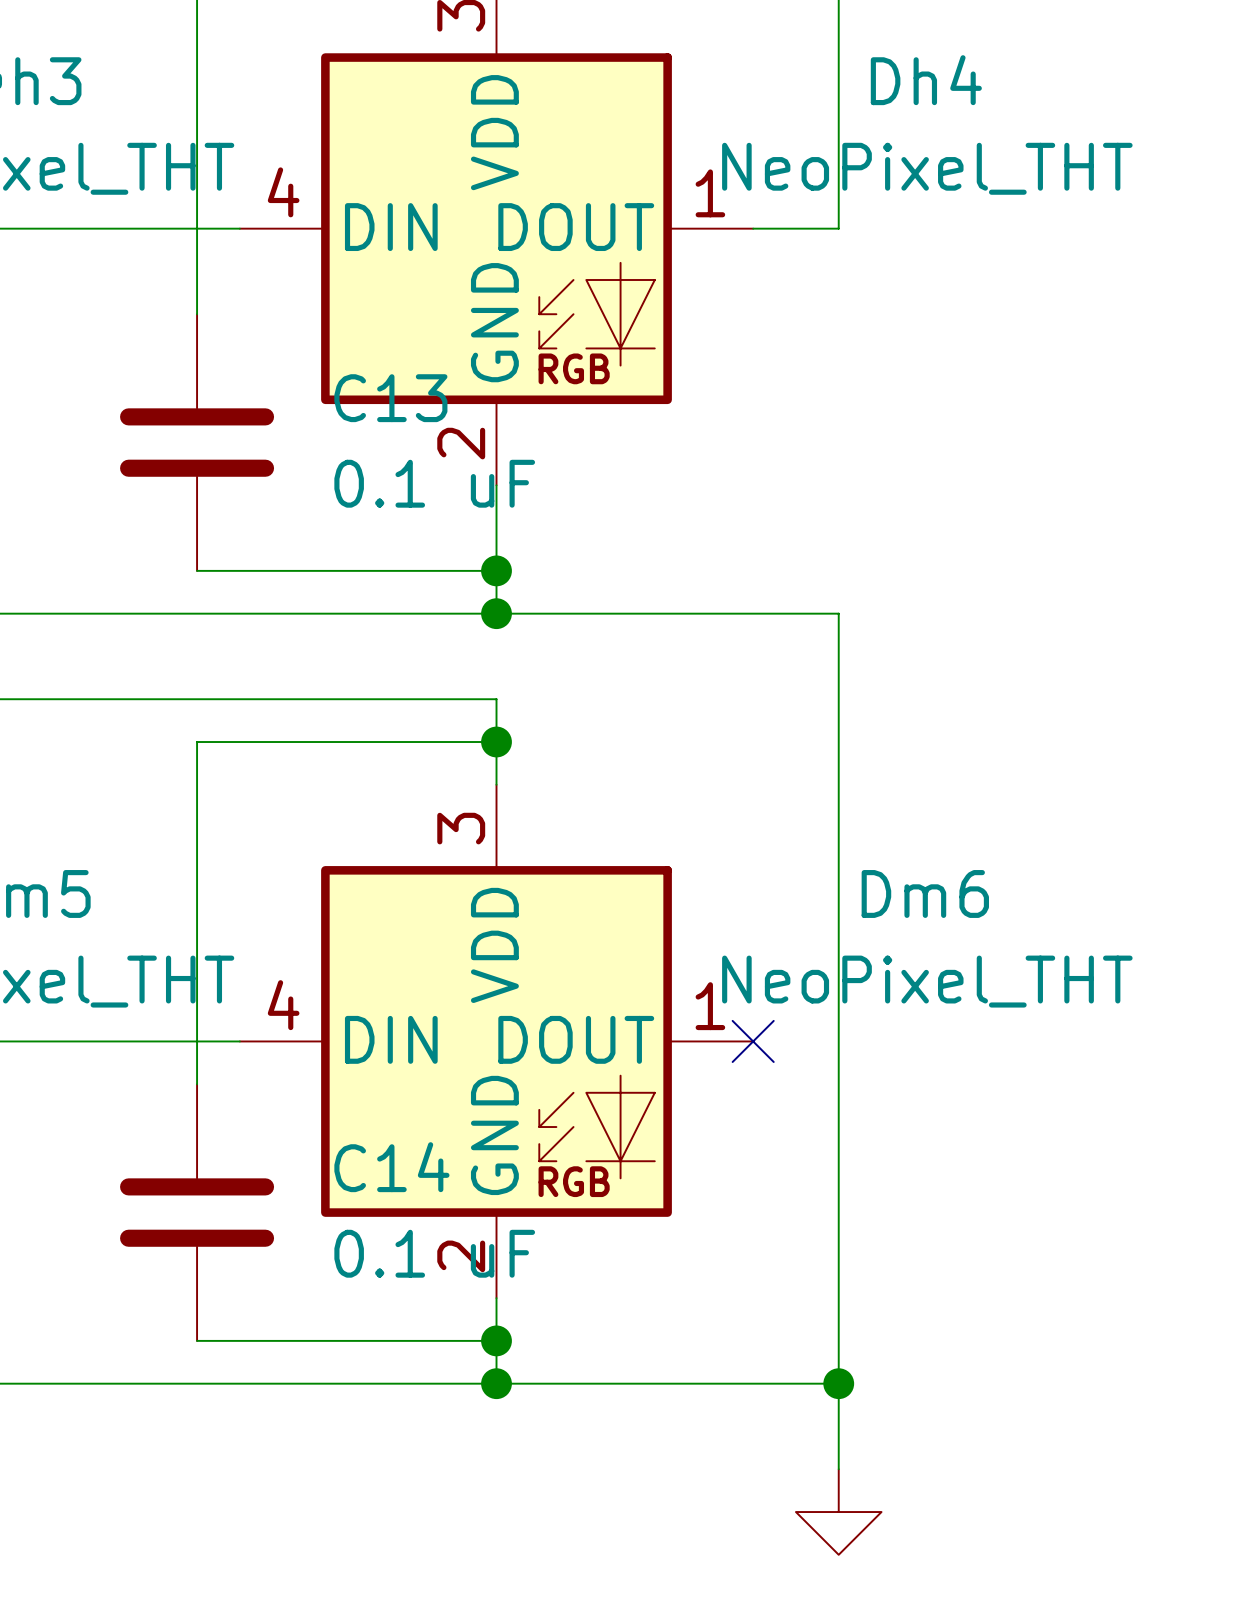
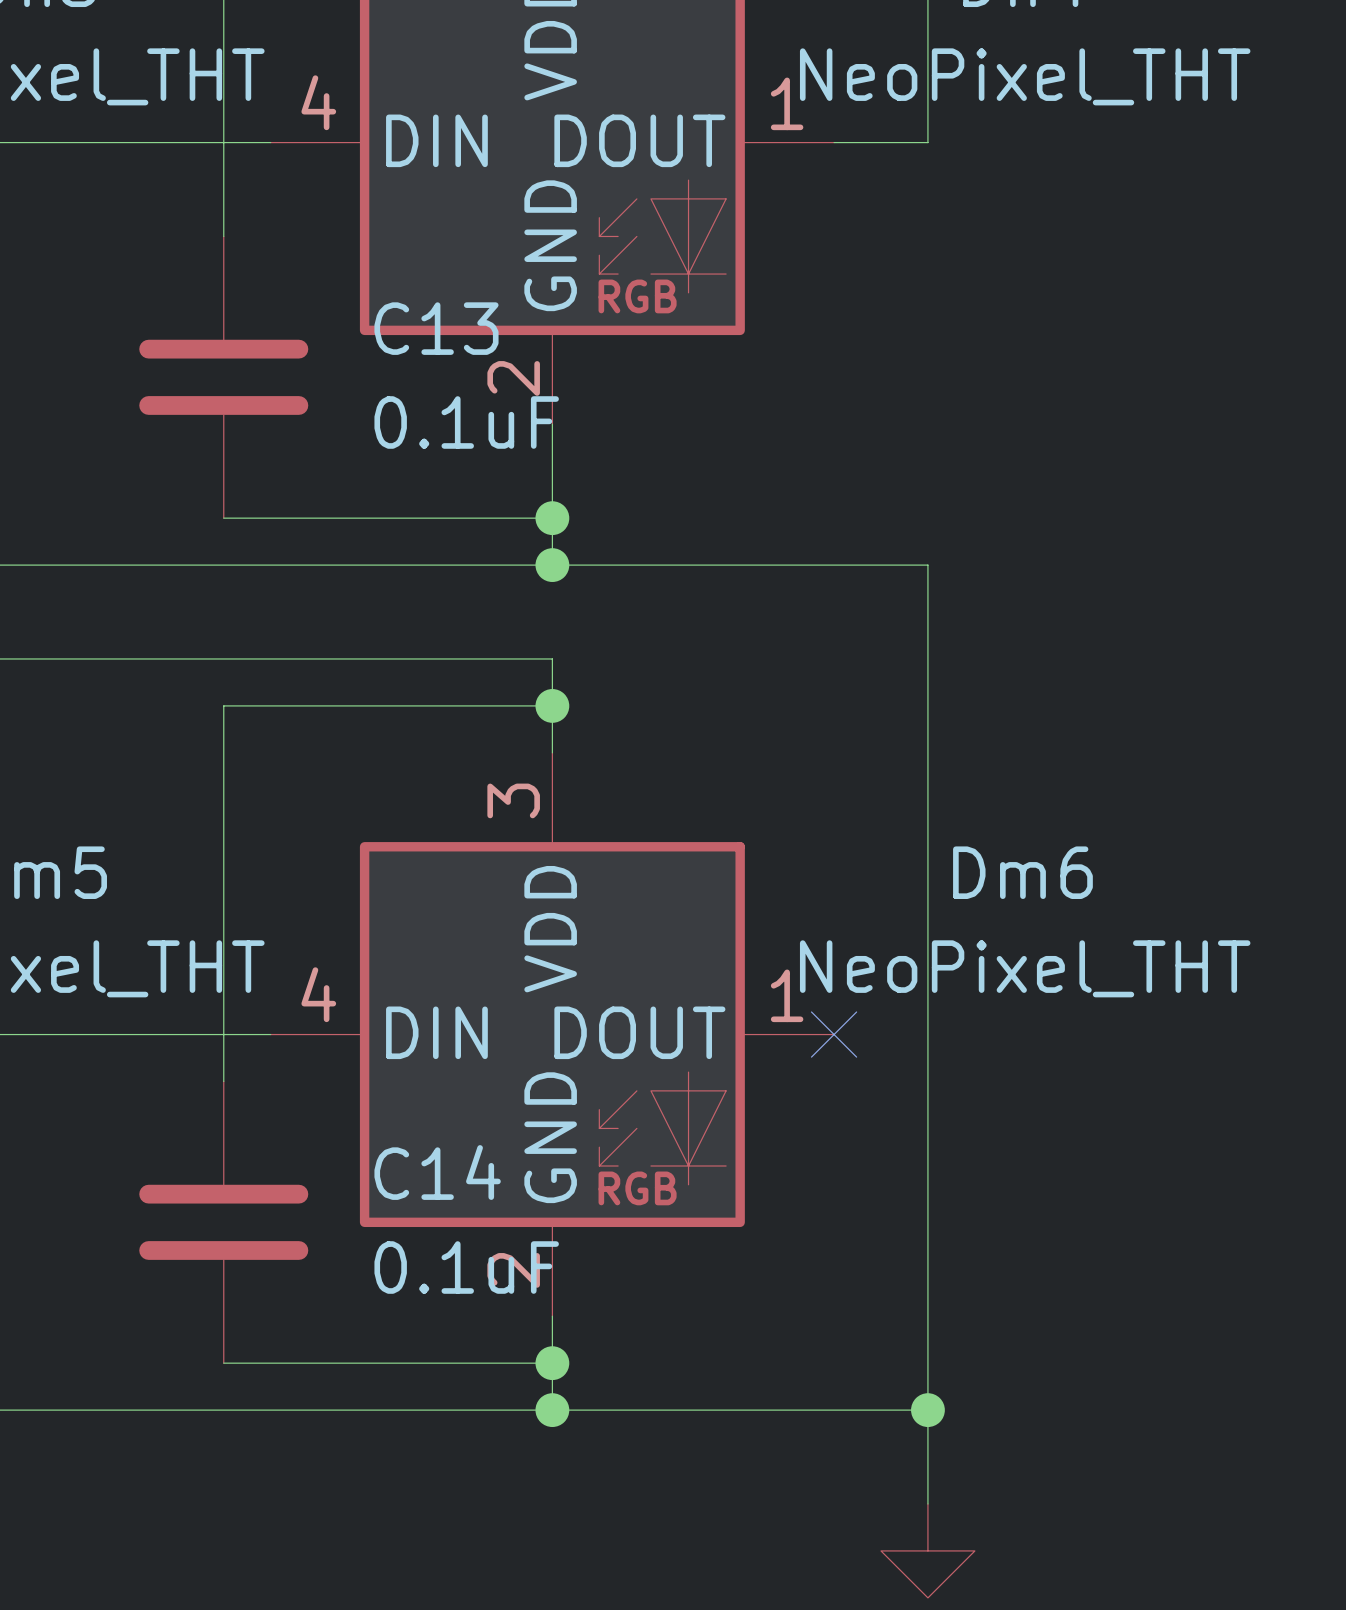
C13 value: 0.1 uF (434, 483) -> 0.1uF (466, 422)
C14 value: 0.1 uF (434, 1253) -> 0.1uF (466, 1267)

